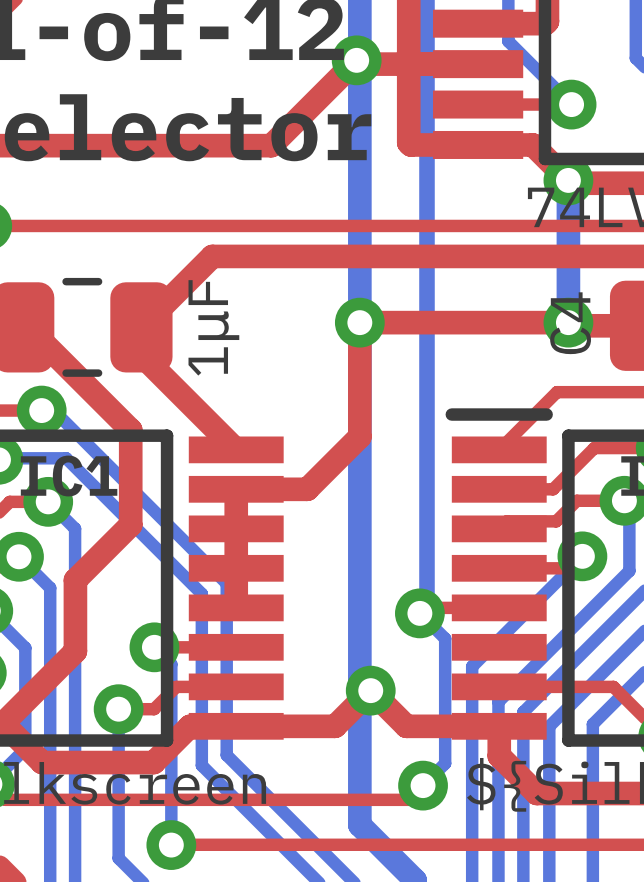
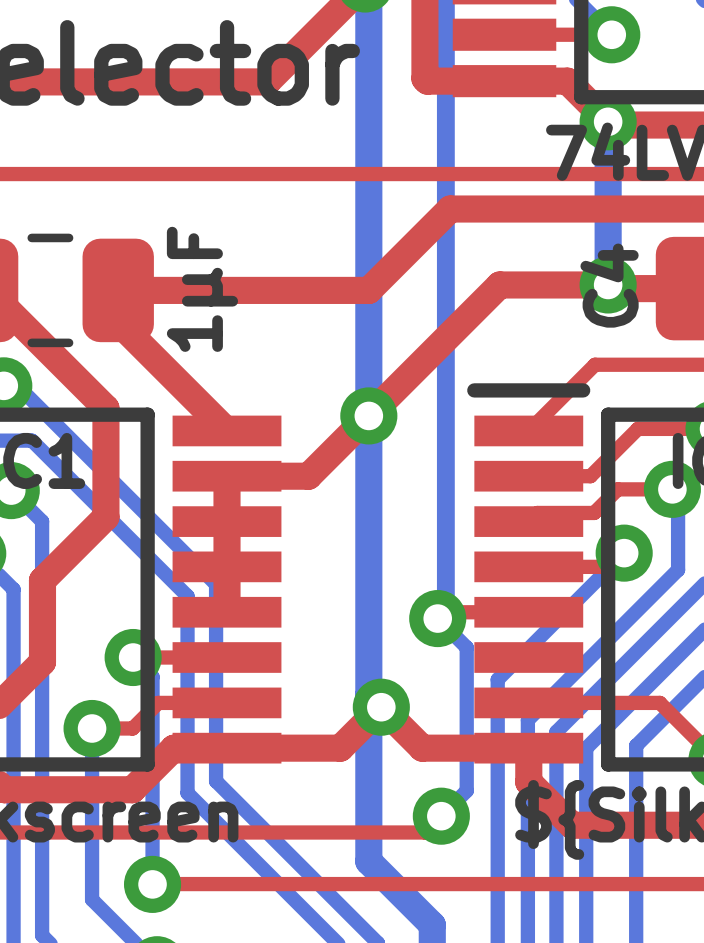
top track: (430, 256) (212, 256) (141, 327) -> (450, 209) (368, 290) (118, 290)
via position: (359, 322) -> (368, 415)
top track: (473, 322) (359, 322) (359, 436) -> (499, 284) (368, 415)

